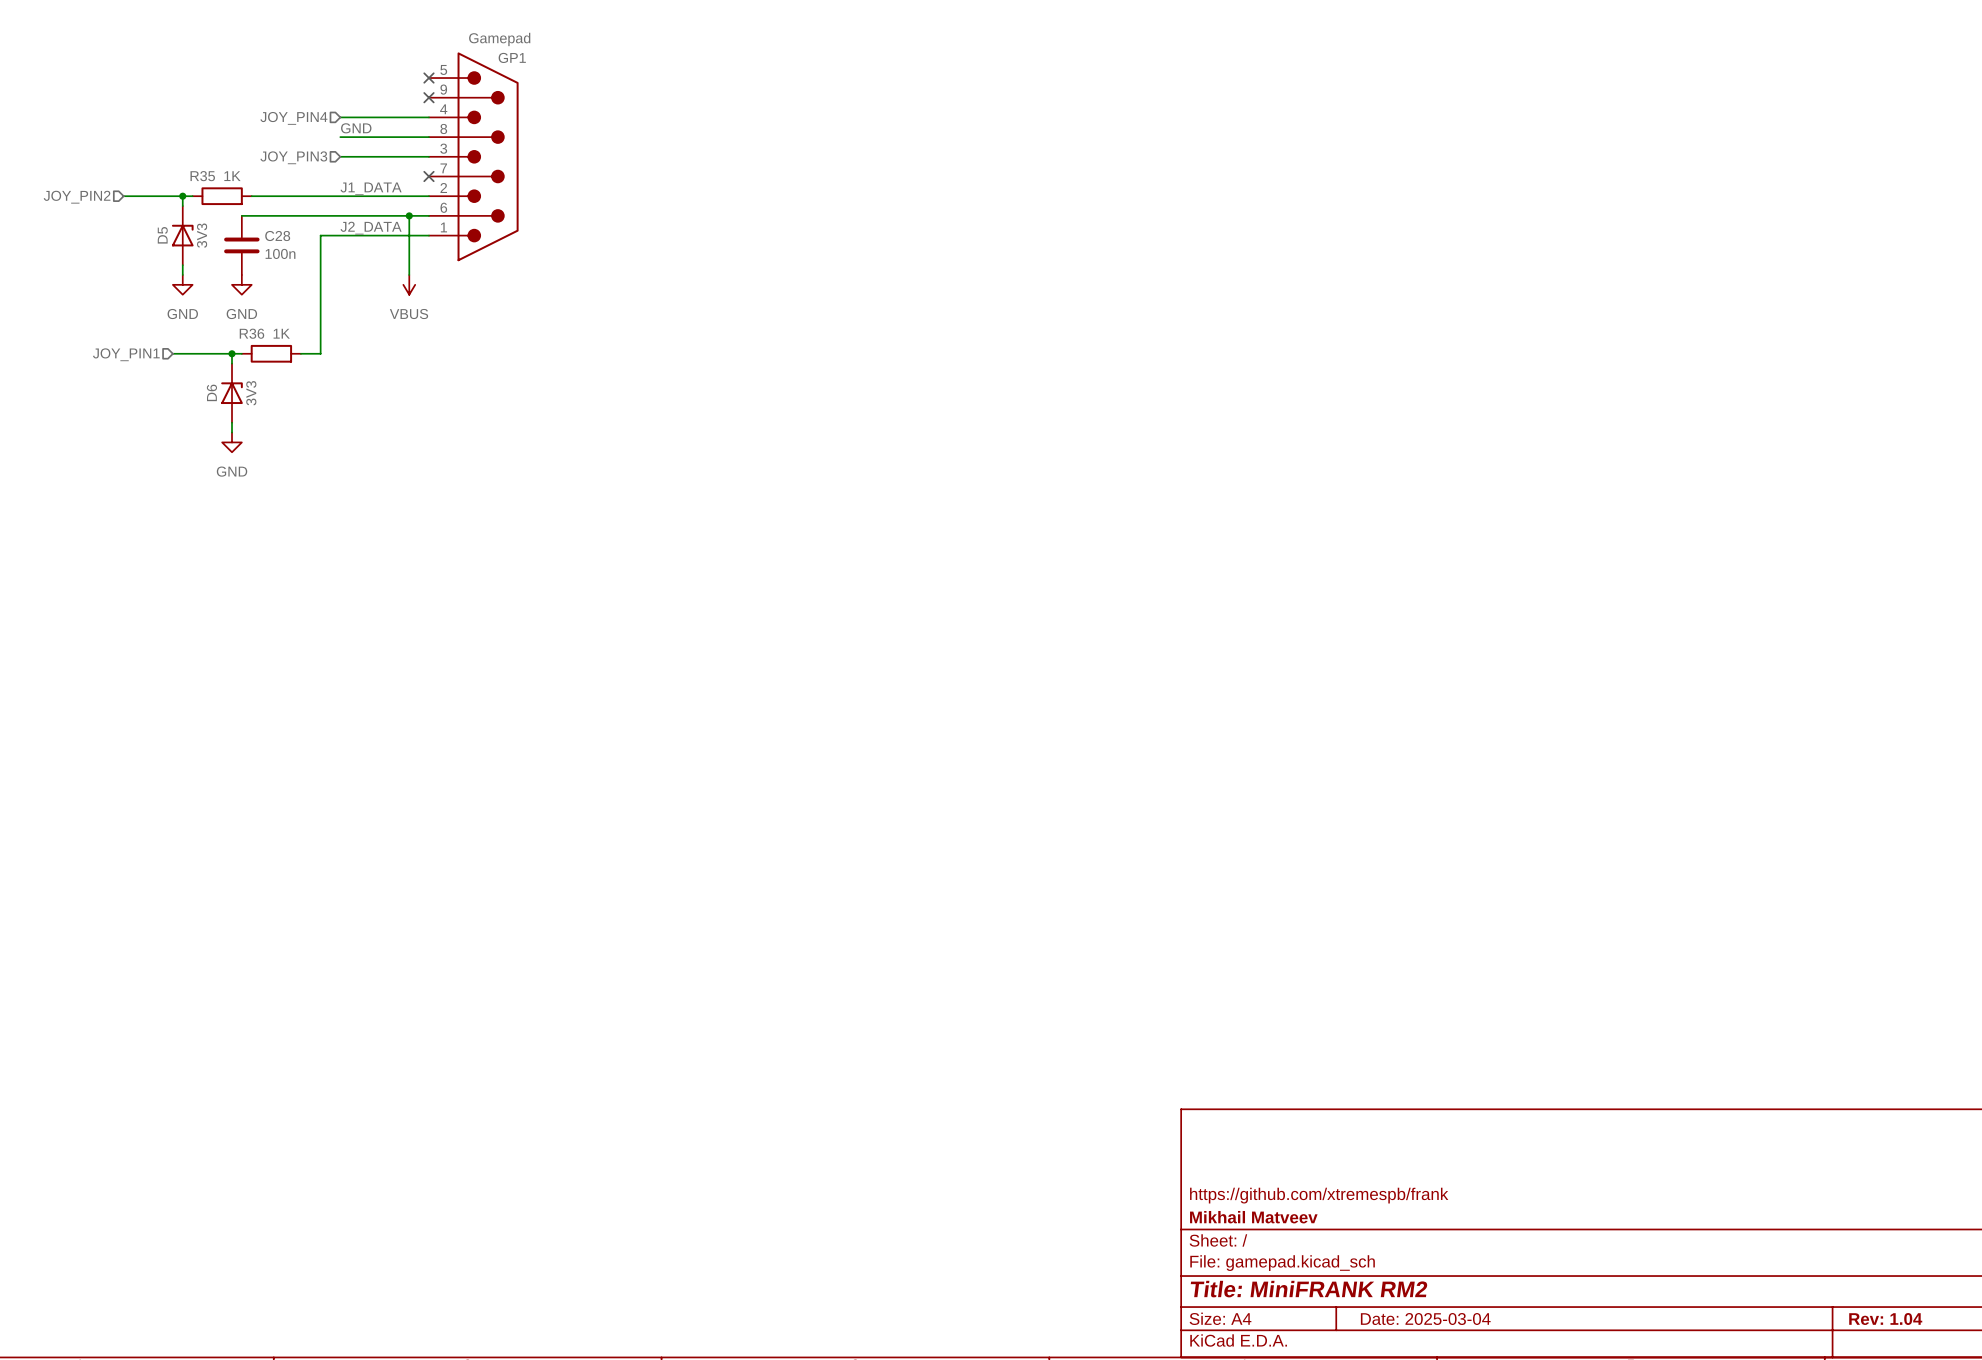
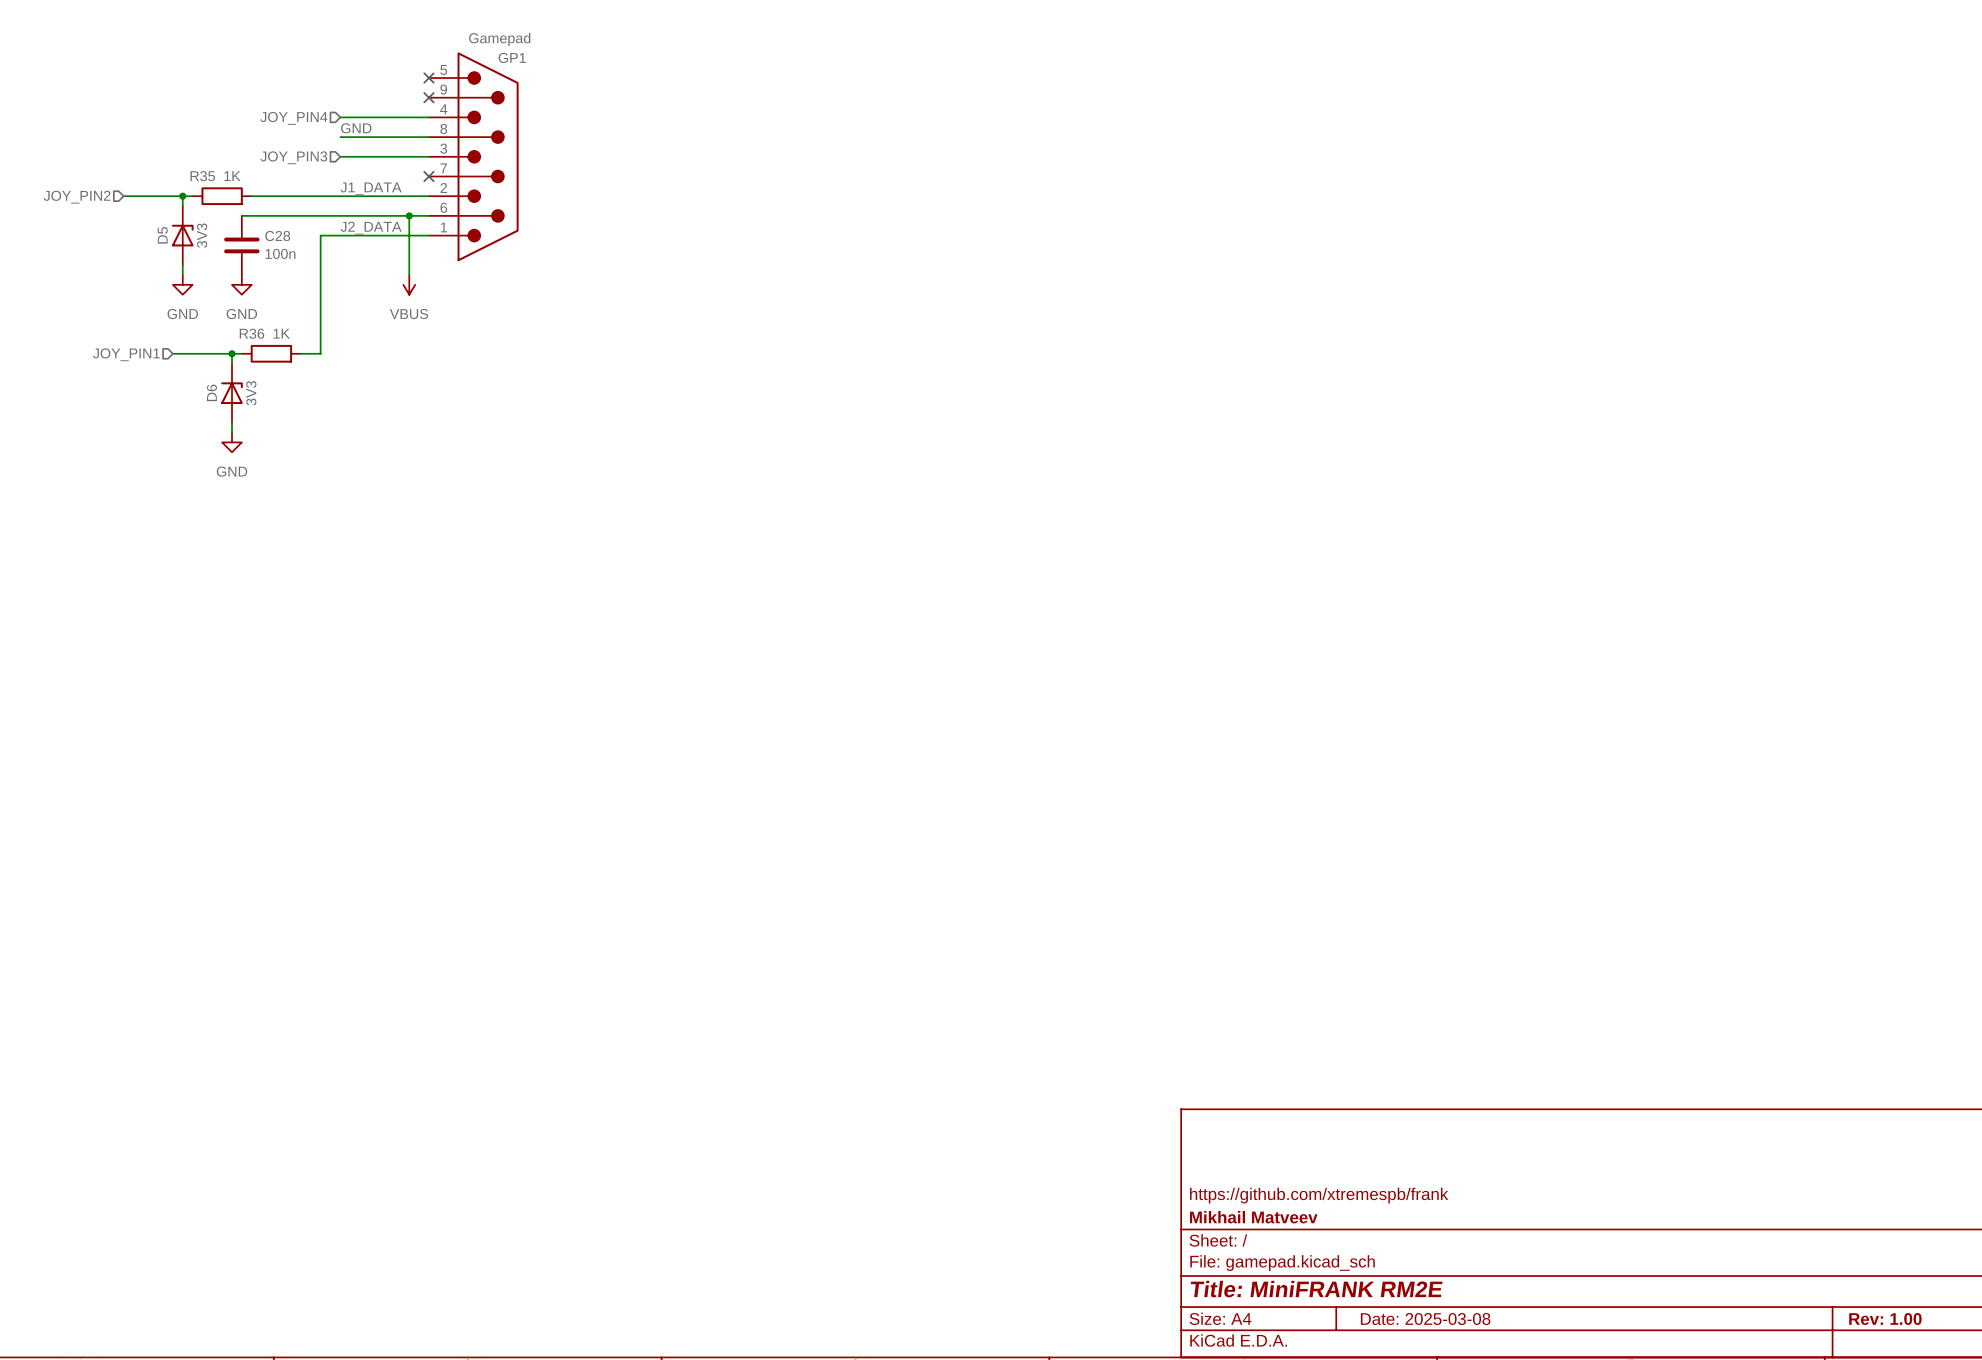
title block: Title: MiniFRANK RM2 (1309, 1289) -> Title: MiniFRANK RM2E (1316, 1289)
title block: Date: 2025-03-04 (1425, 1319) -> Date: 2025-03-08 (1425, 1319)
title block: Rev: 1.04 (1885, 1319) -> Rev: 1.00 (1885, 1319)

